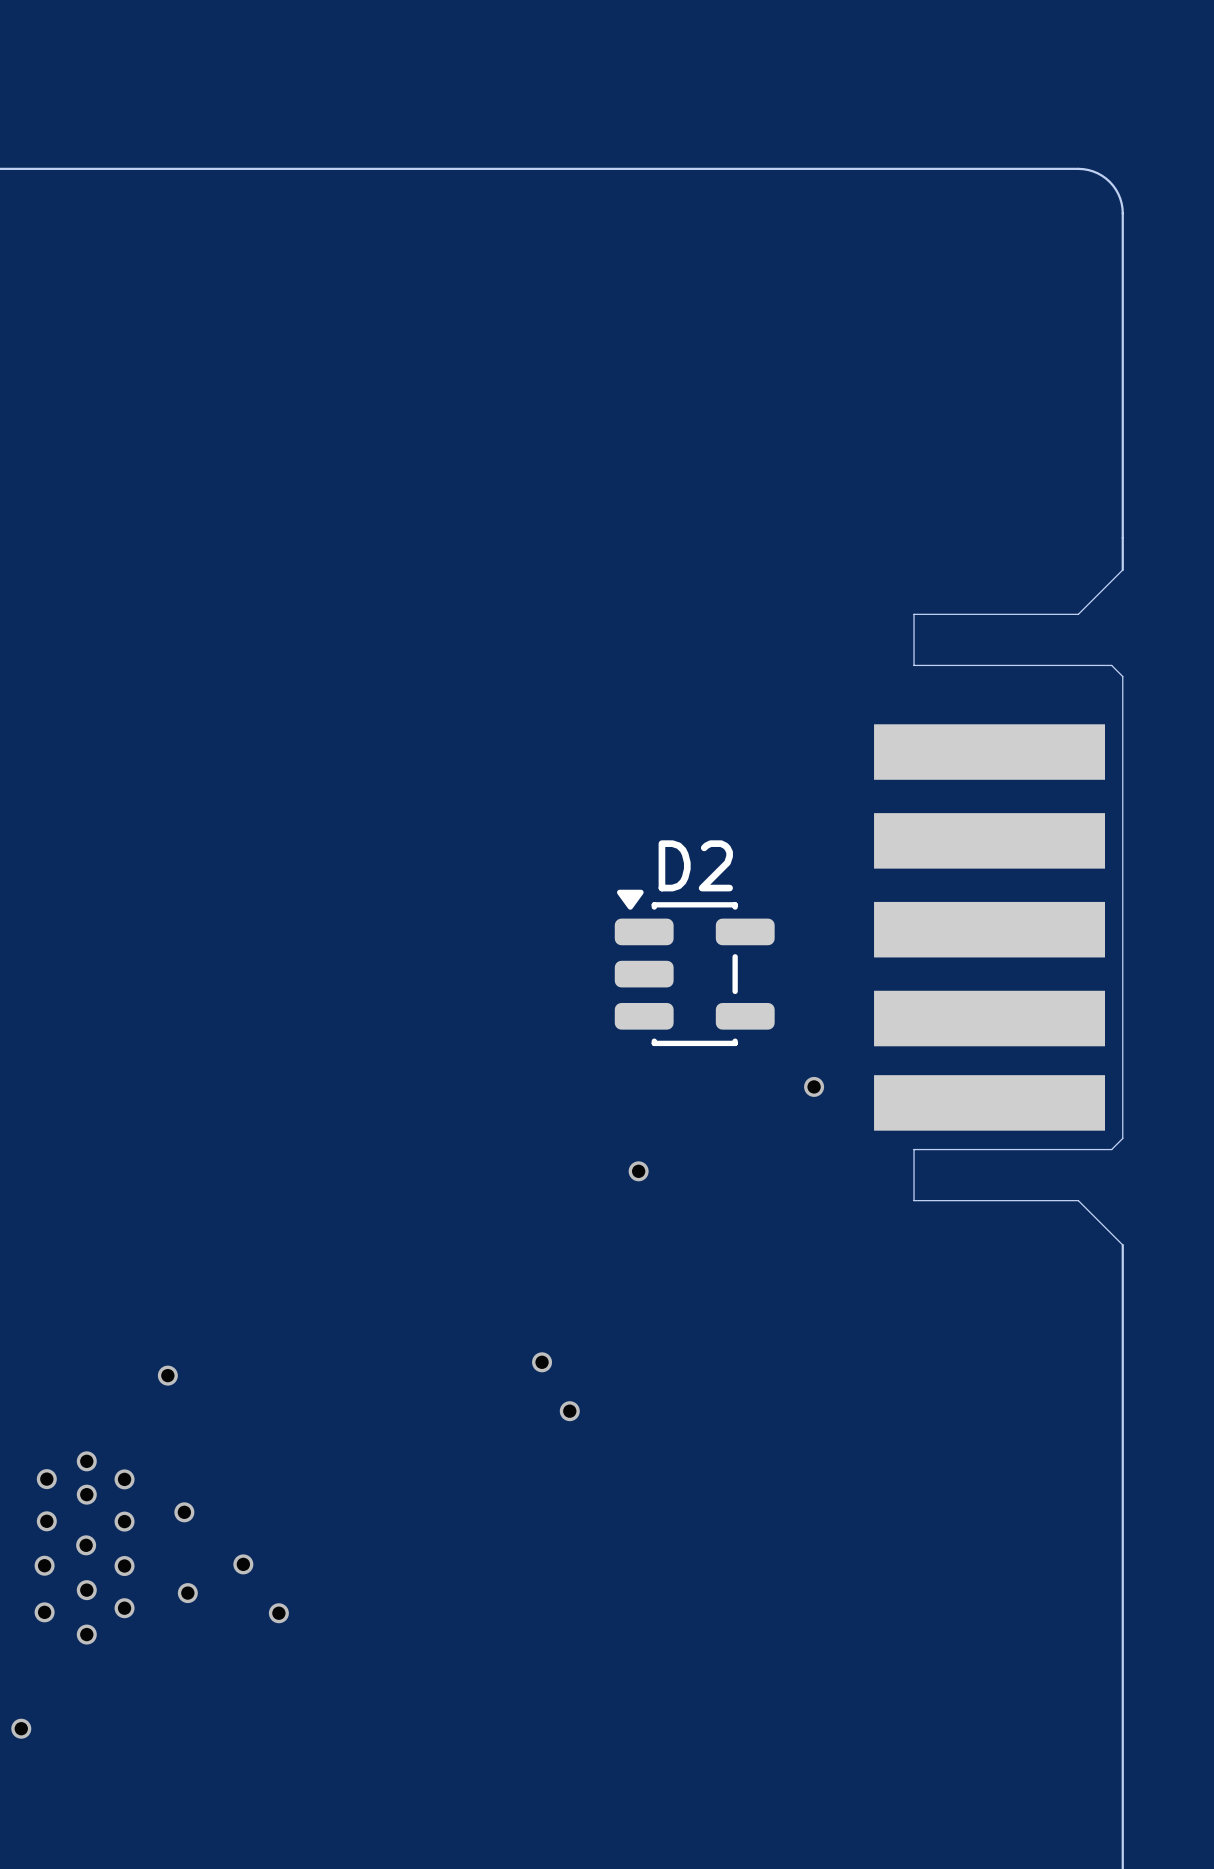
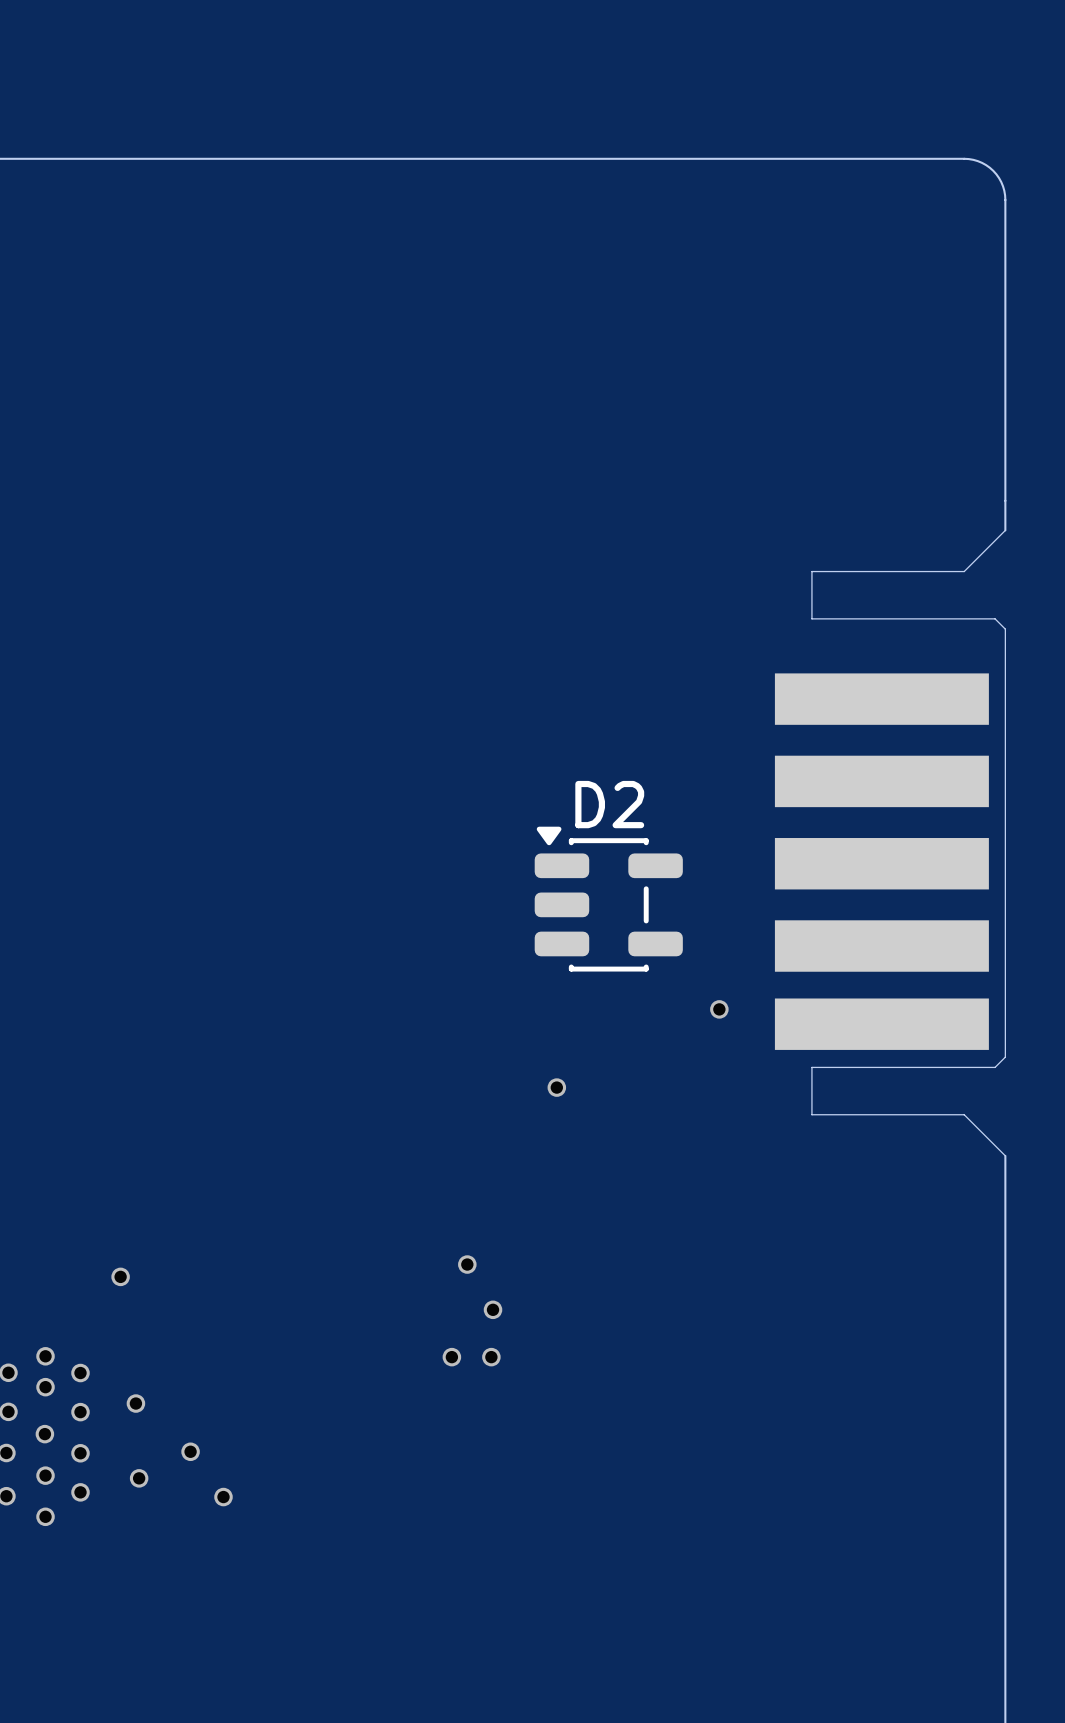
via: none -> (451, 1357)
via: none -> (491, 1357)

